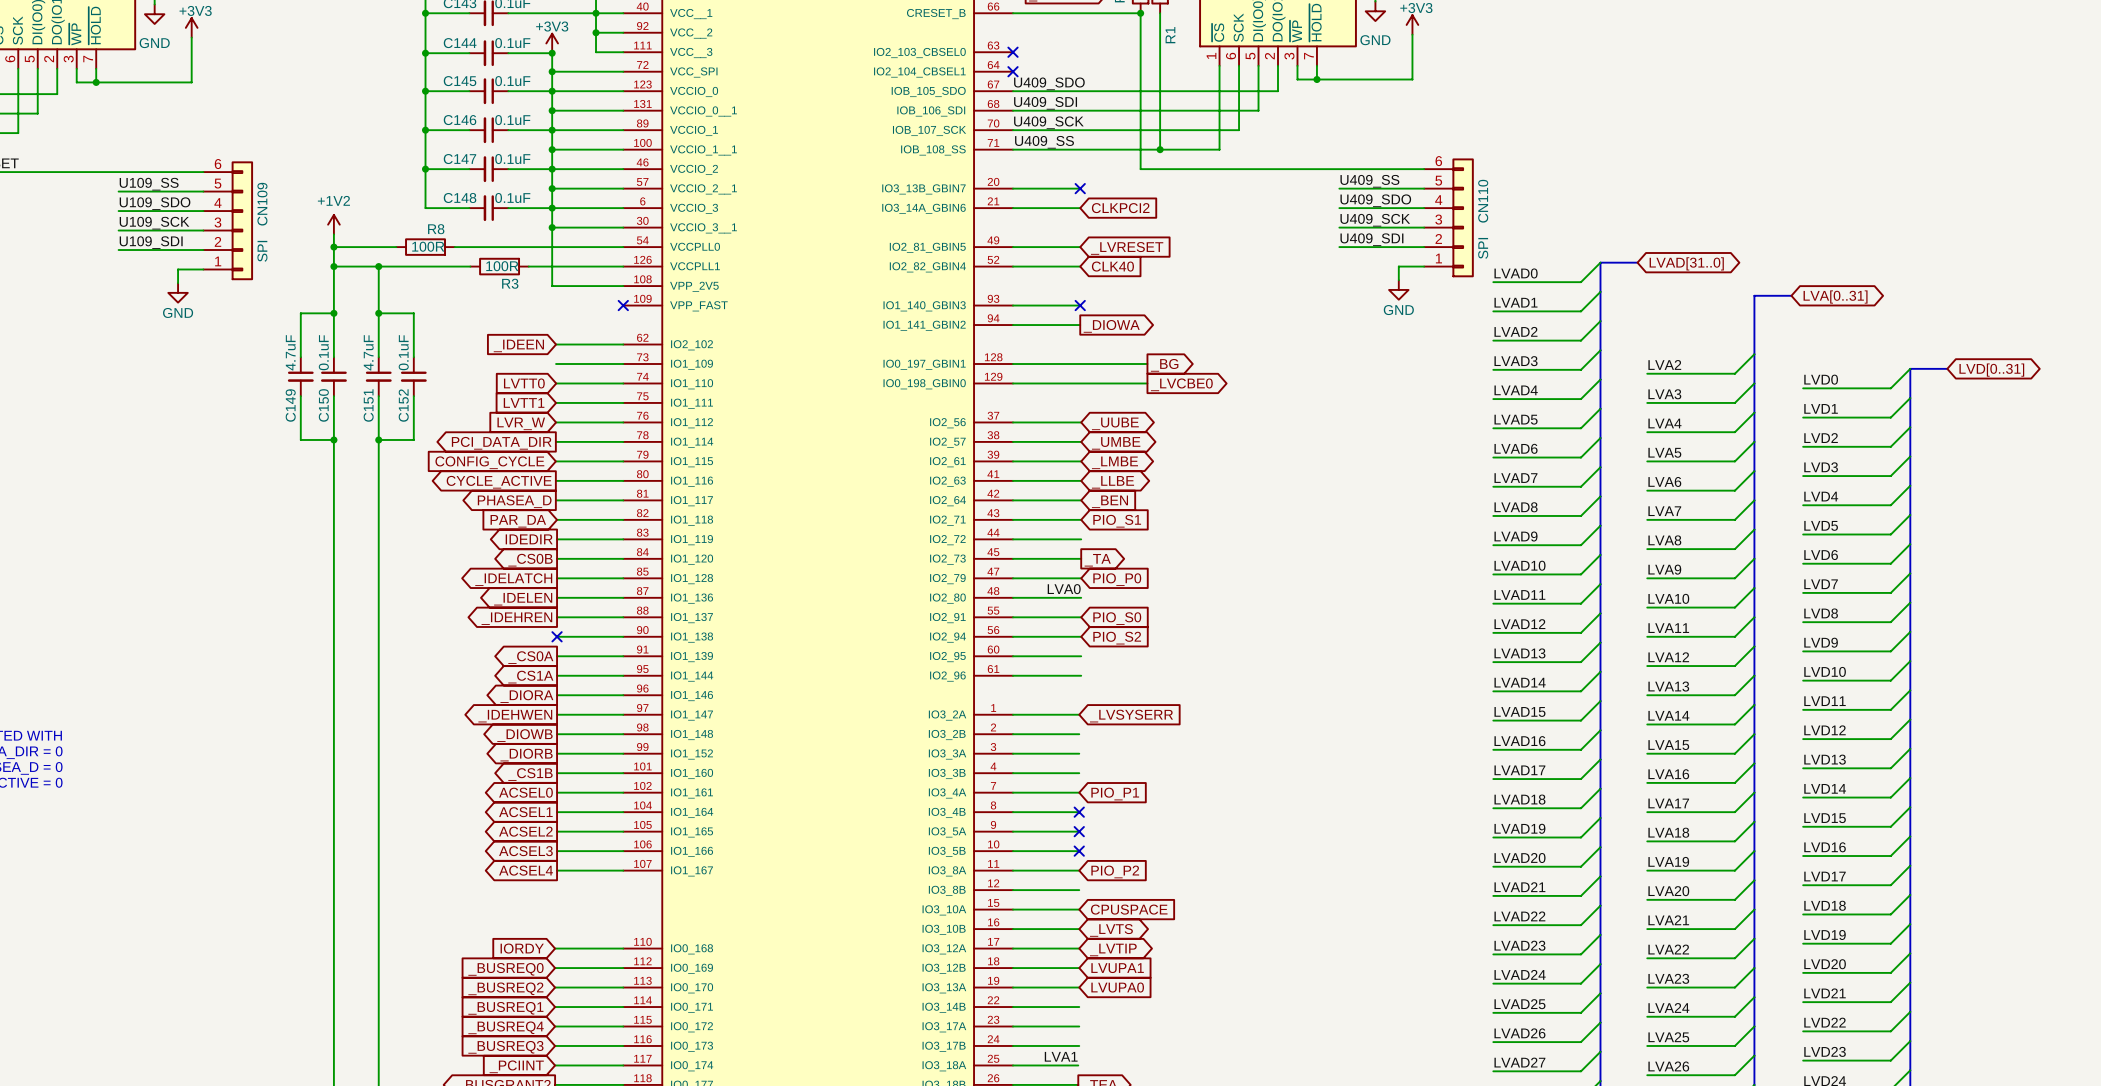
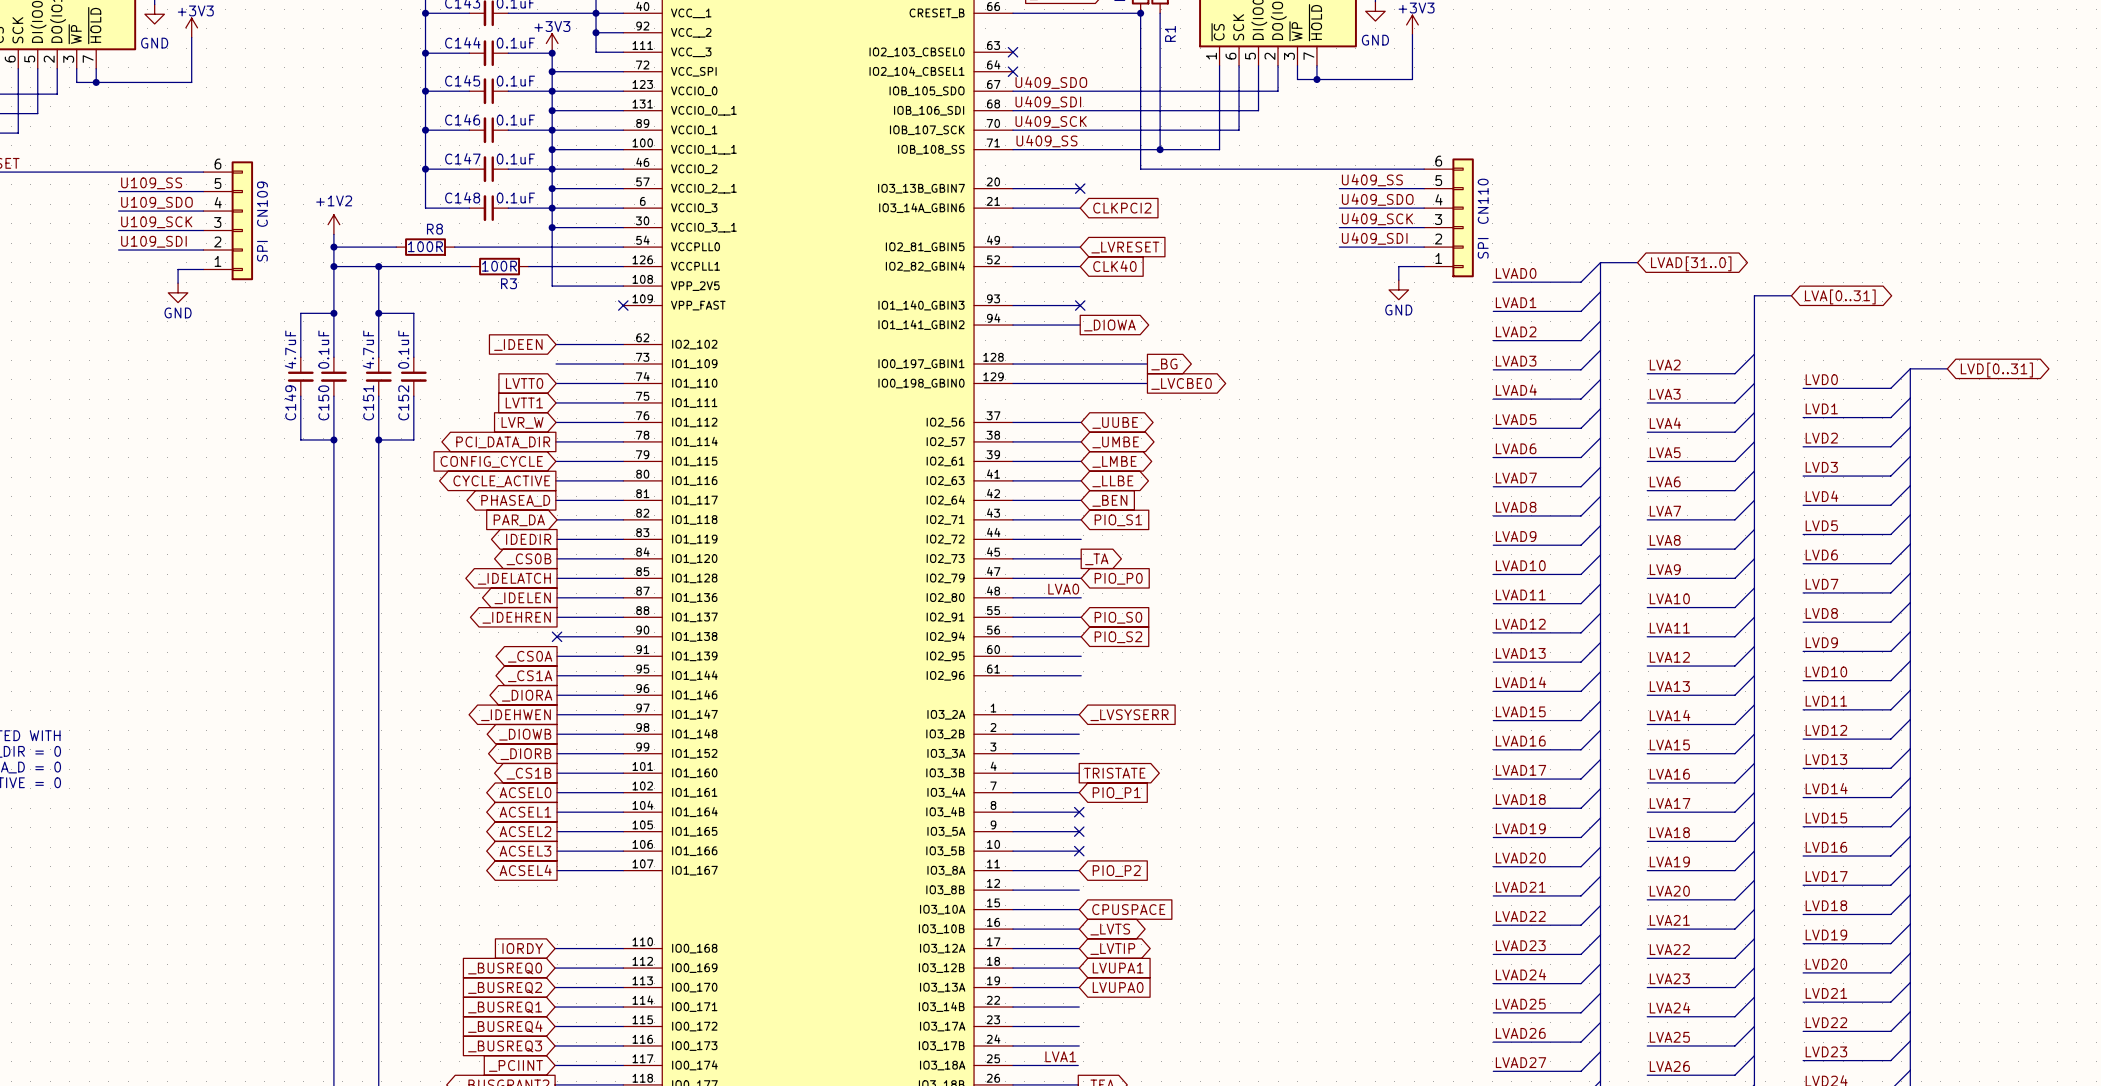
global label: none -> TRISTATE (1114, 773)

